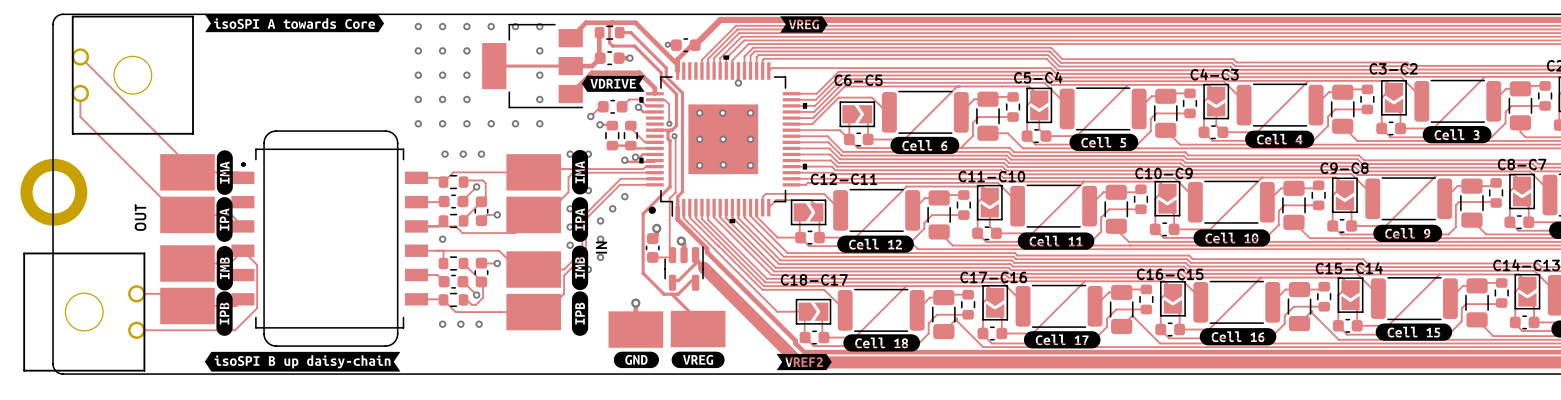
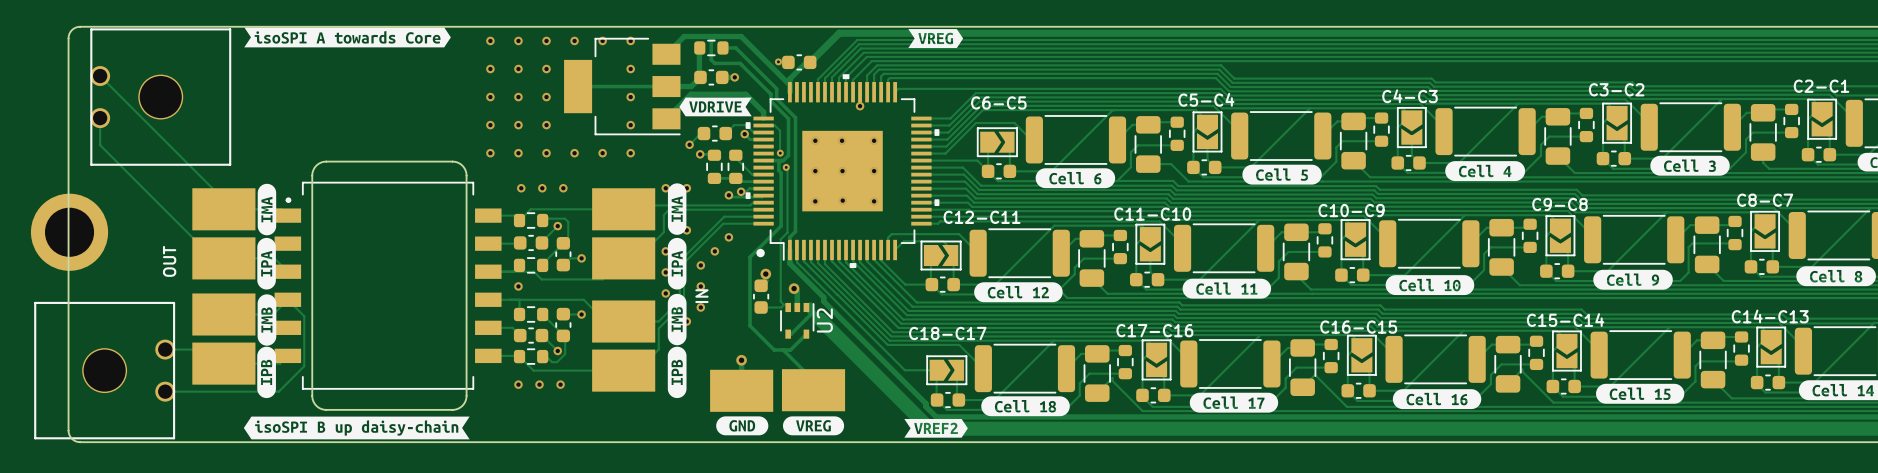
part: (684, 268) -> none
U2: none -> (797, 320)

